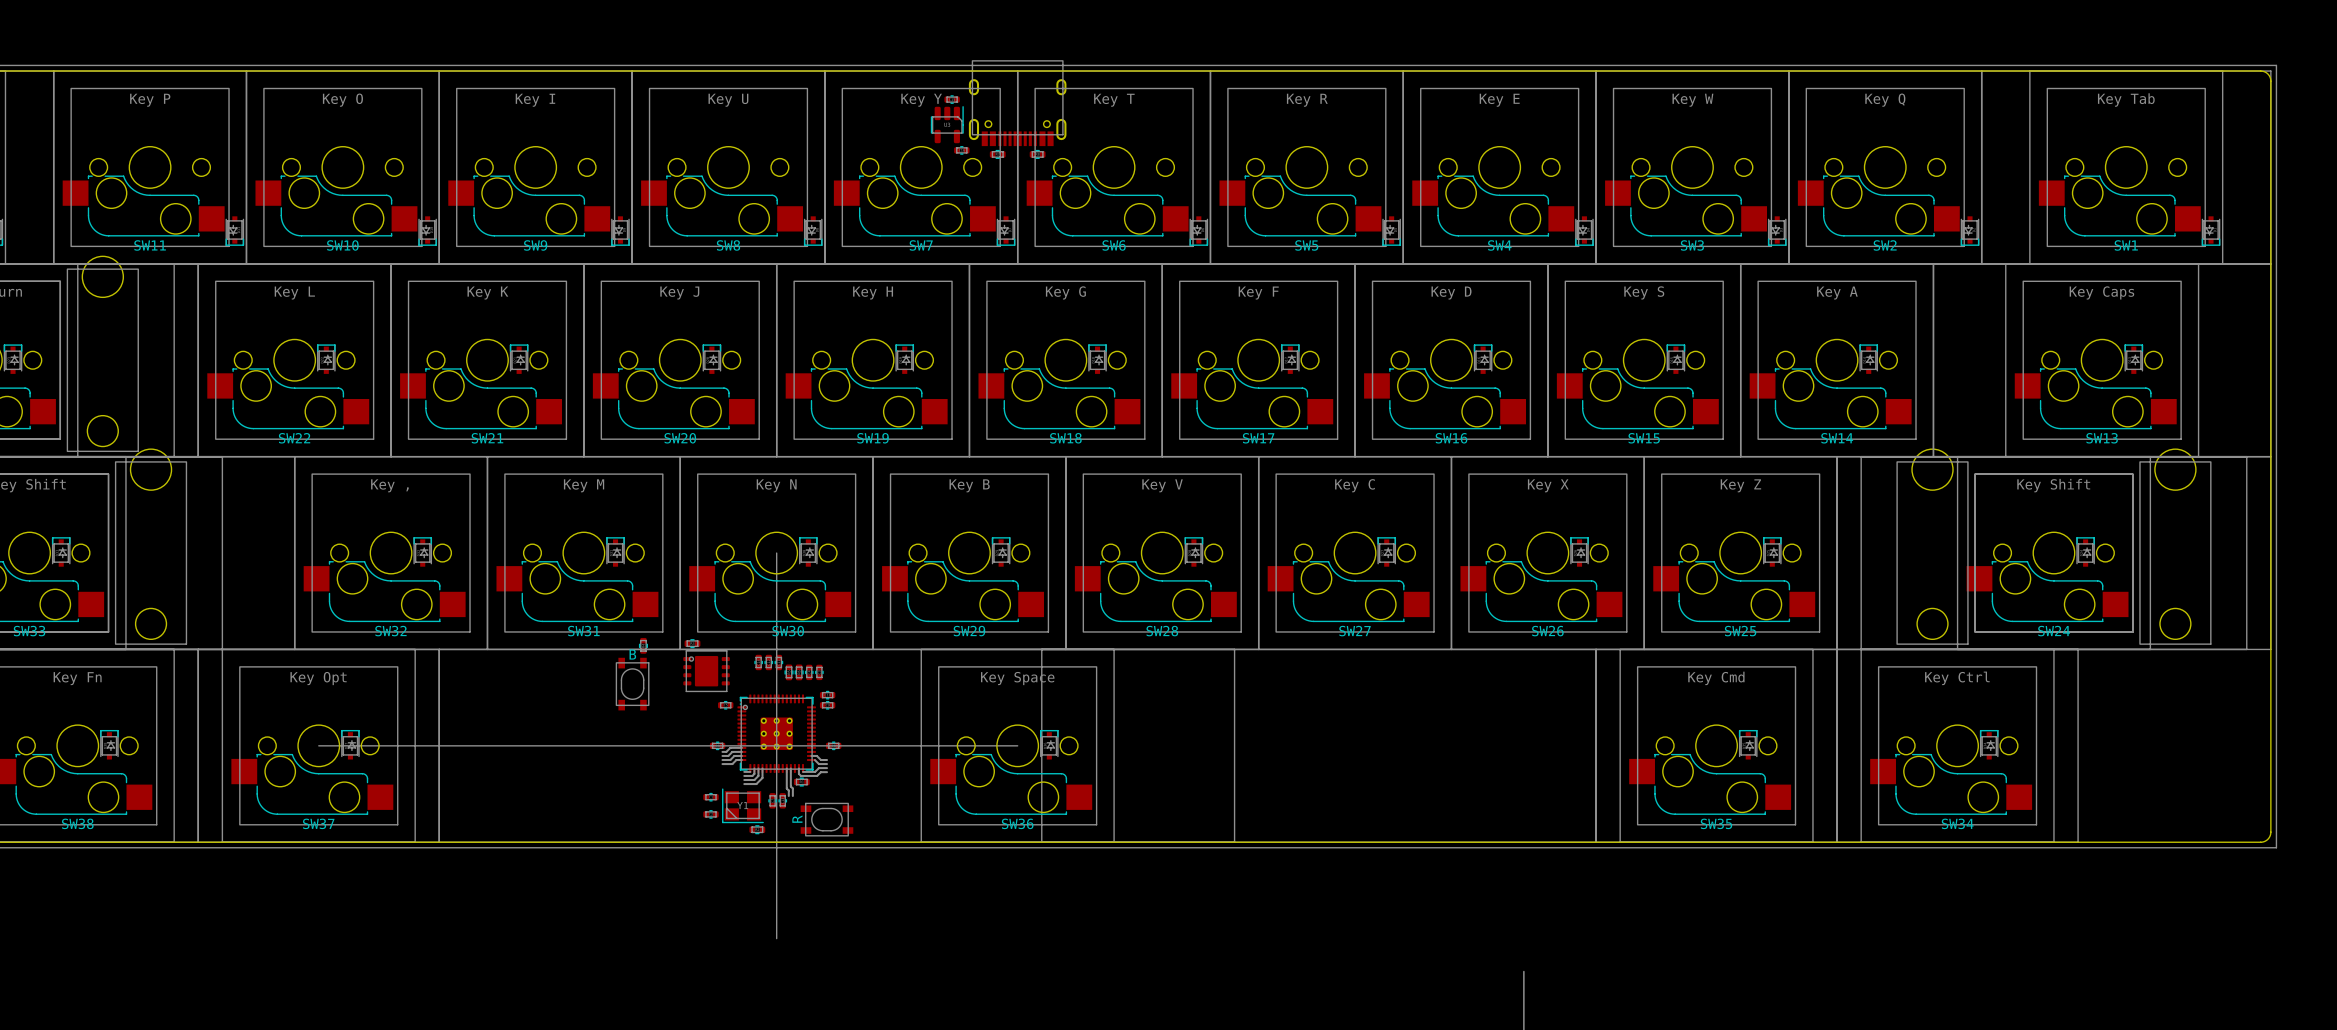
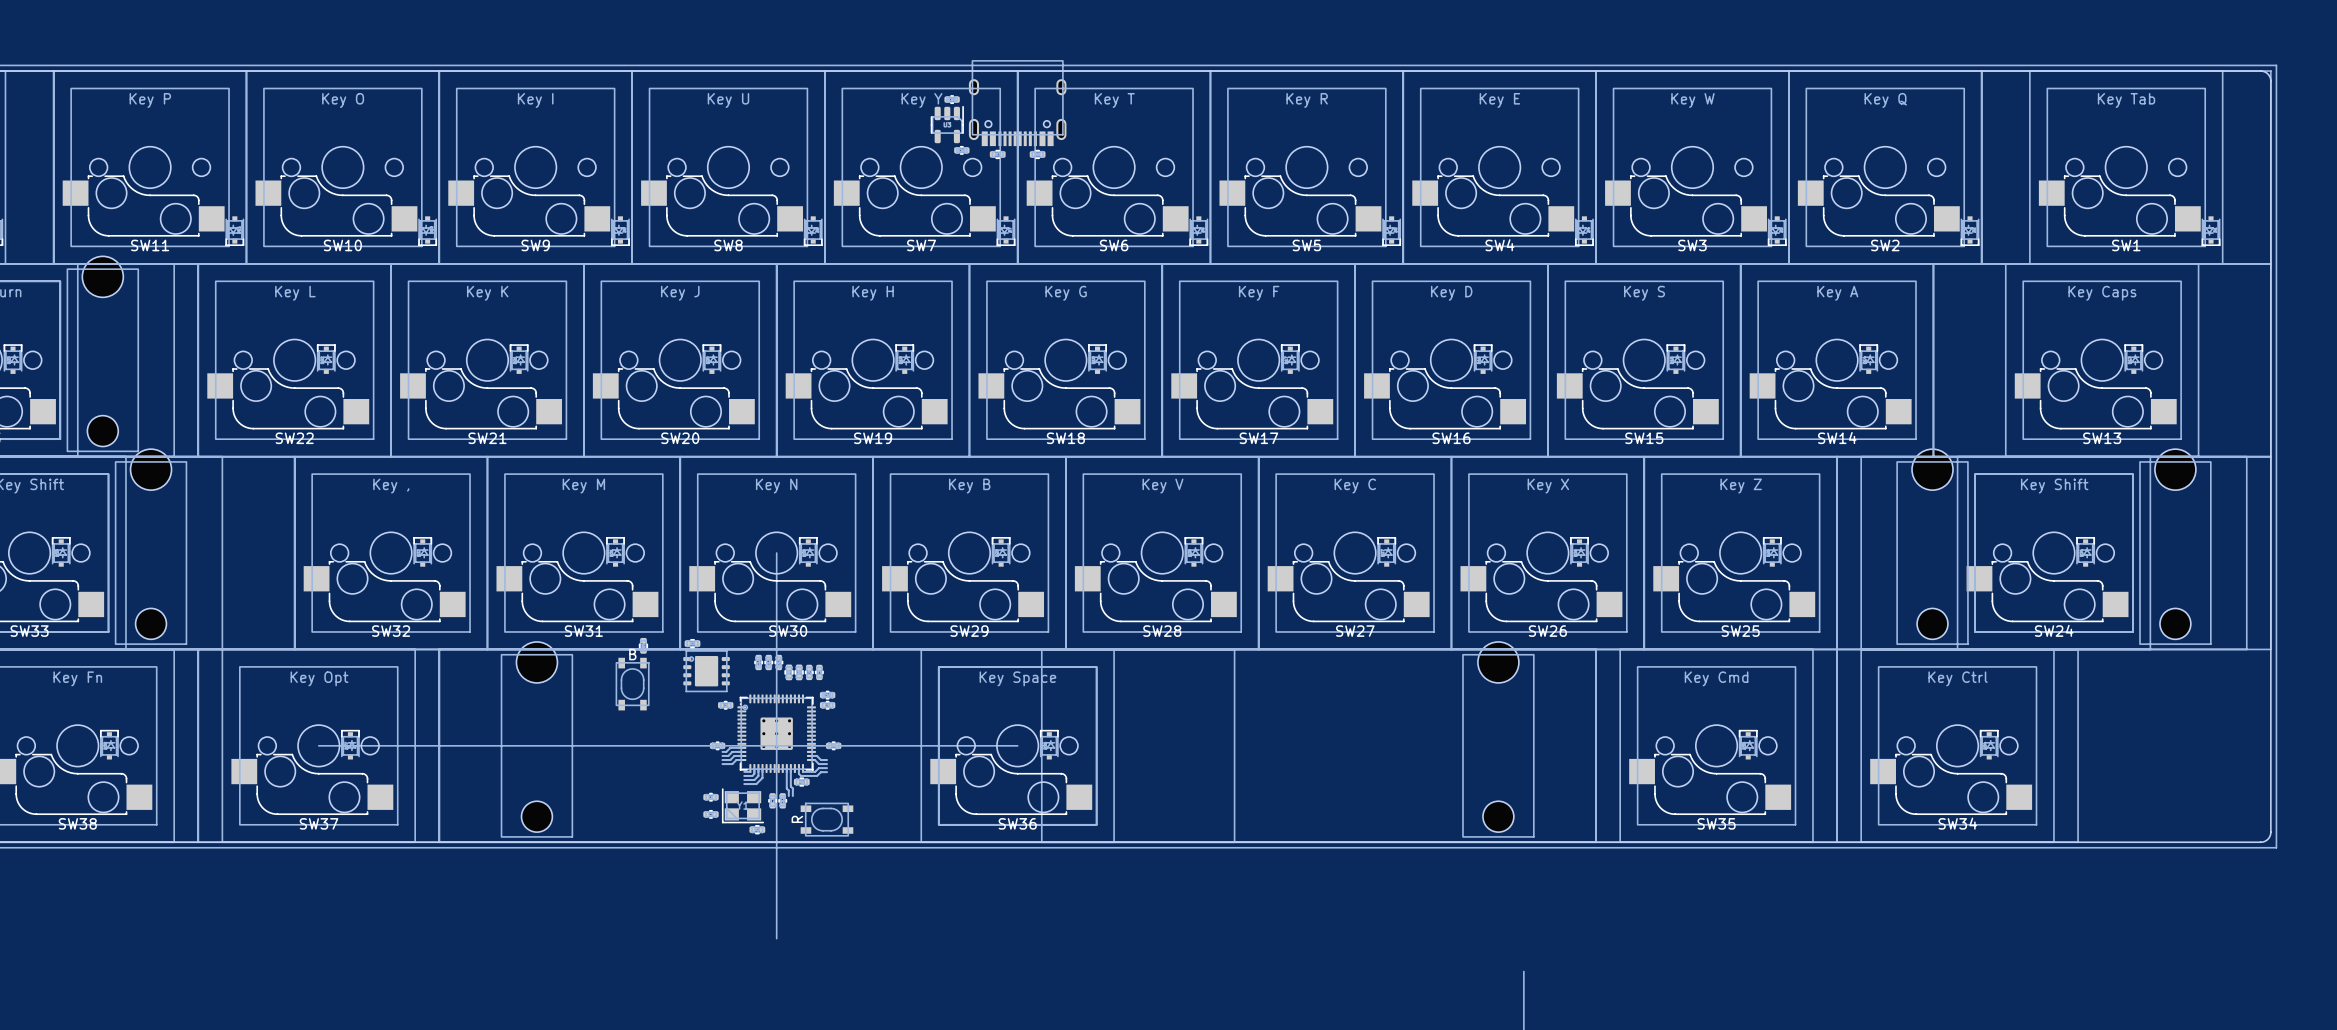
part: none -> (1017, 742)

